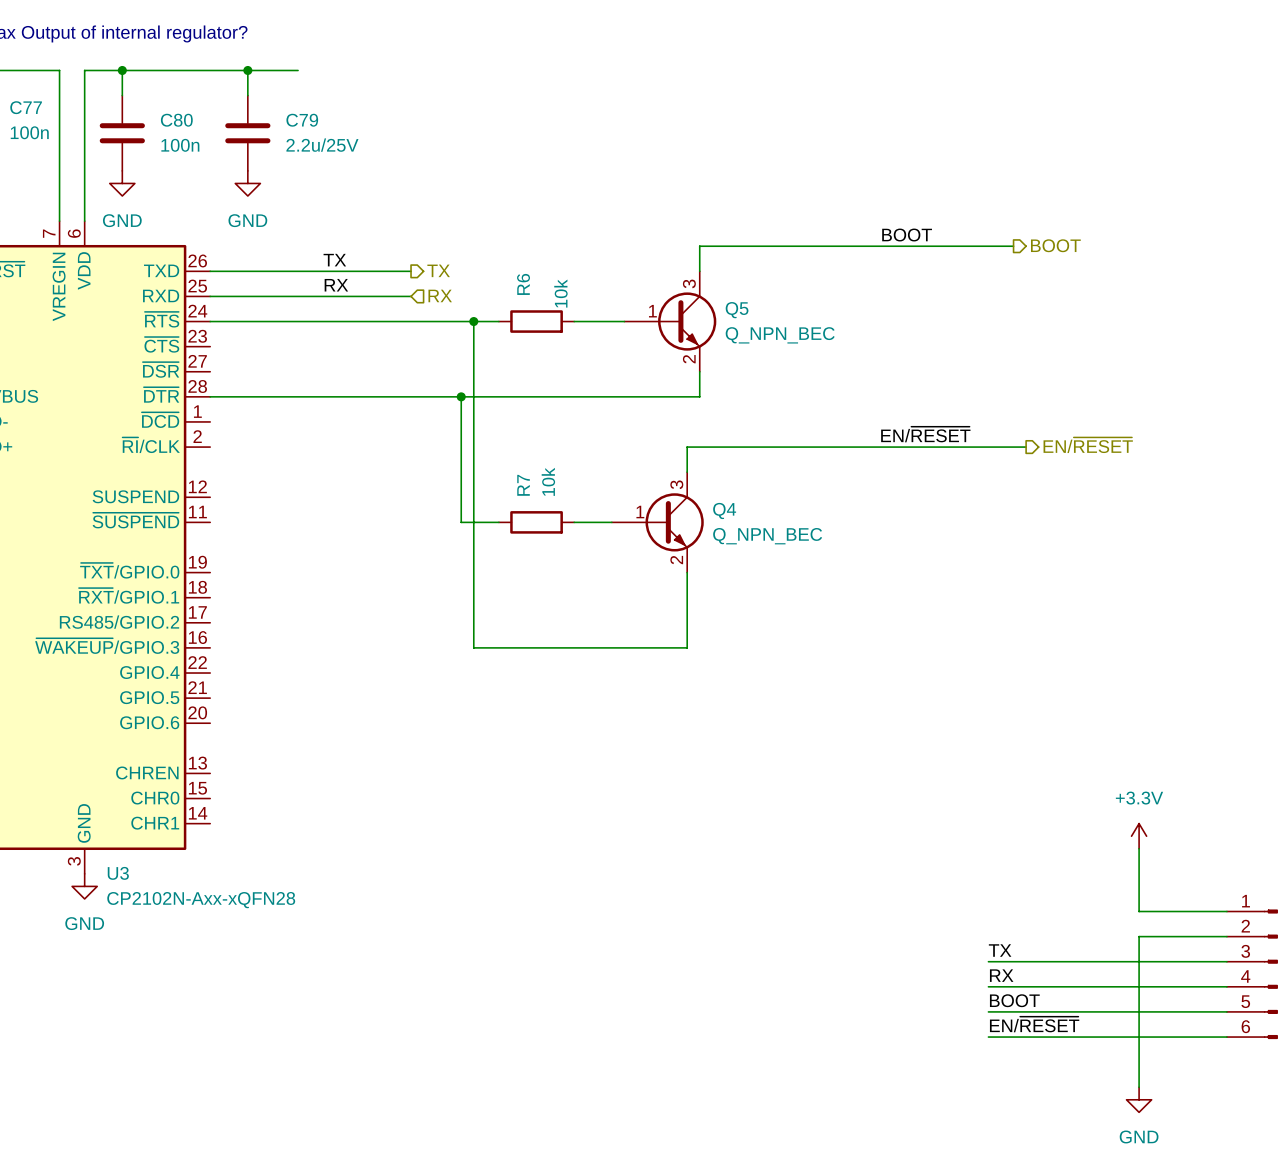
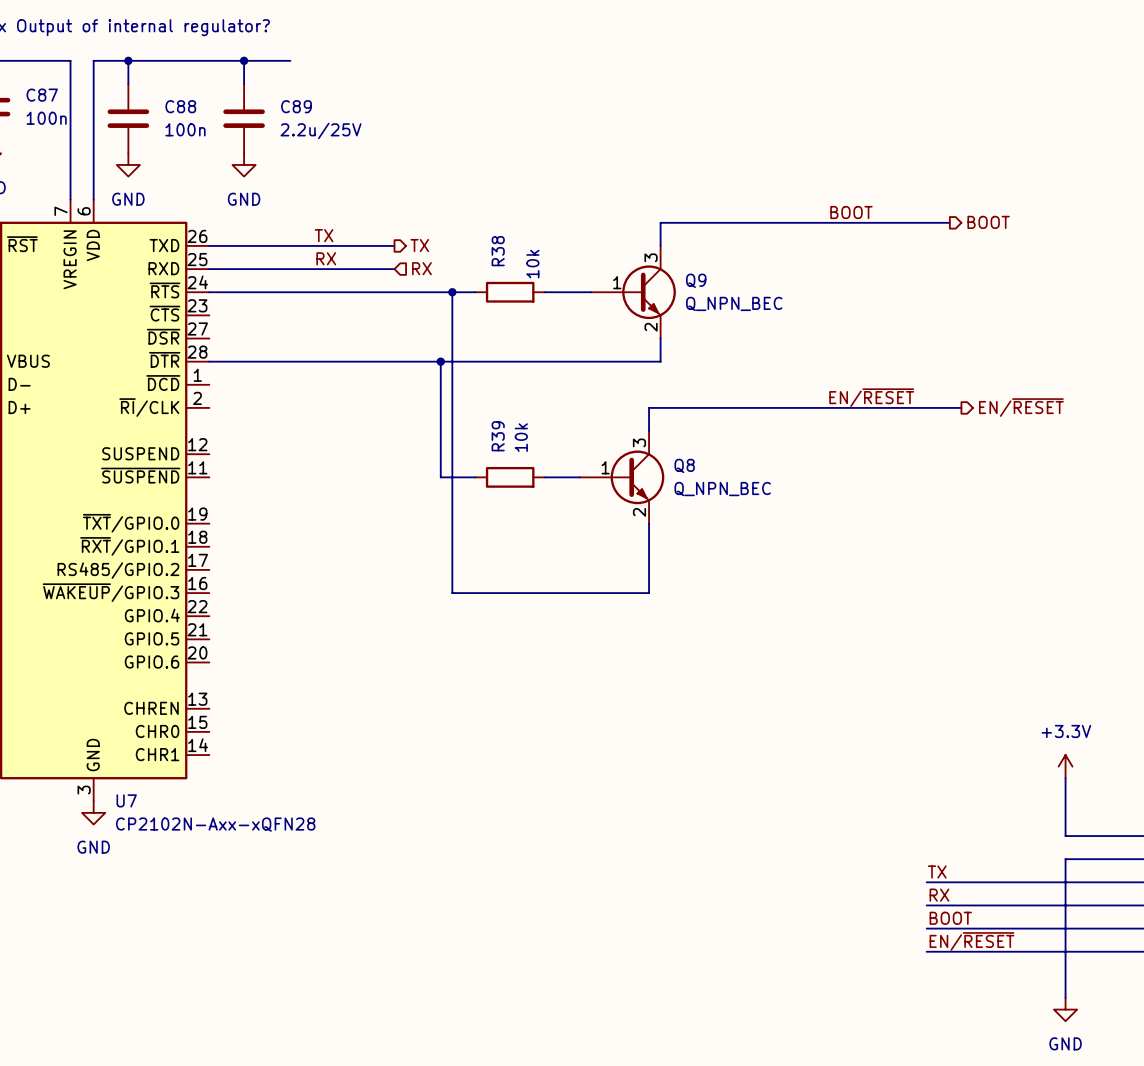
C77 name: C77 (26, 107) -> C87 (42, 95)
C80 name: C80 (176, 120) -> C88 (180, 106)
C79 name: C79 (302, 120) -> C89 (296, 106)
R6 name: R6 (523, 284) -> R38 (498, 251)
Q5 name: Q5 (737, 310) -> Q9 (696, 280)
R7 name: R7 (523, 485) -> R39 (498, 436)
Q4 name: Q4 (724, 510) -> Q8 (684, 465)
U3 name: U3 (118, 873) -> U7 (126, 800)

